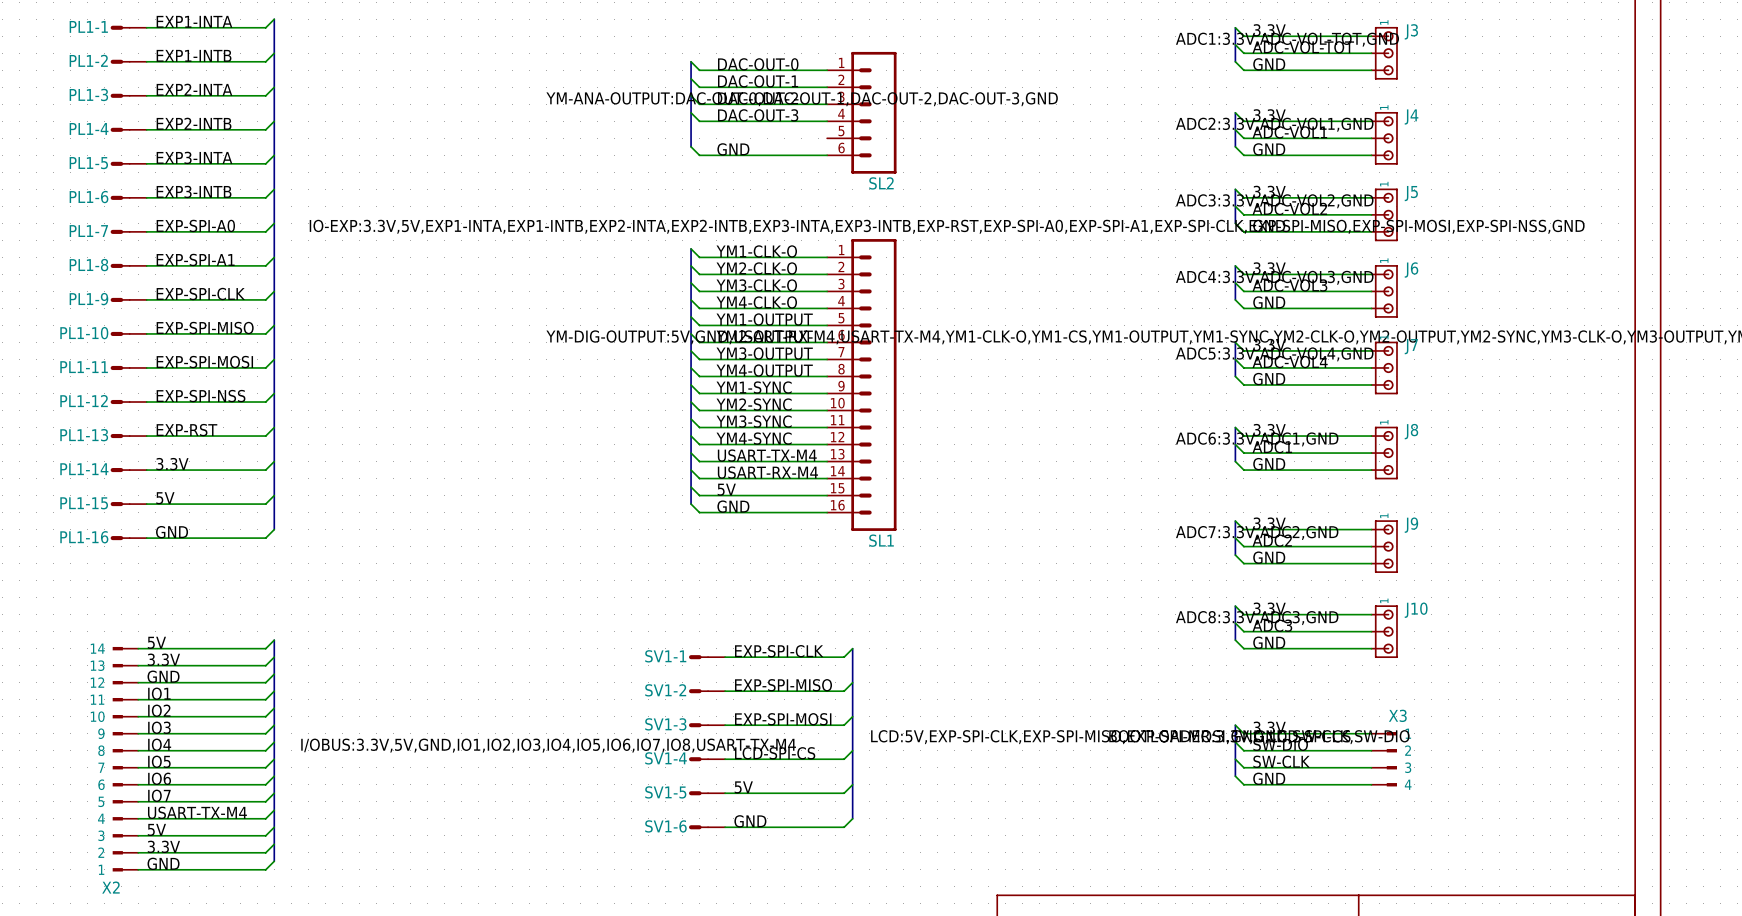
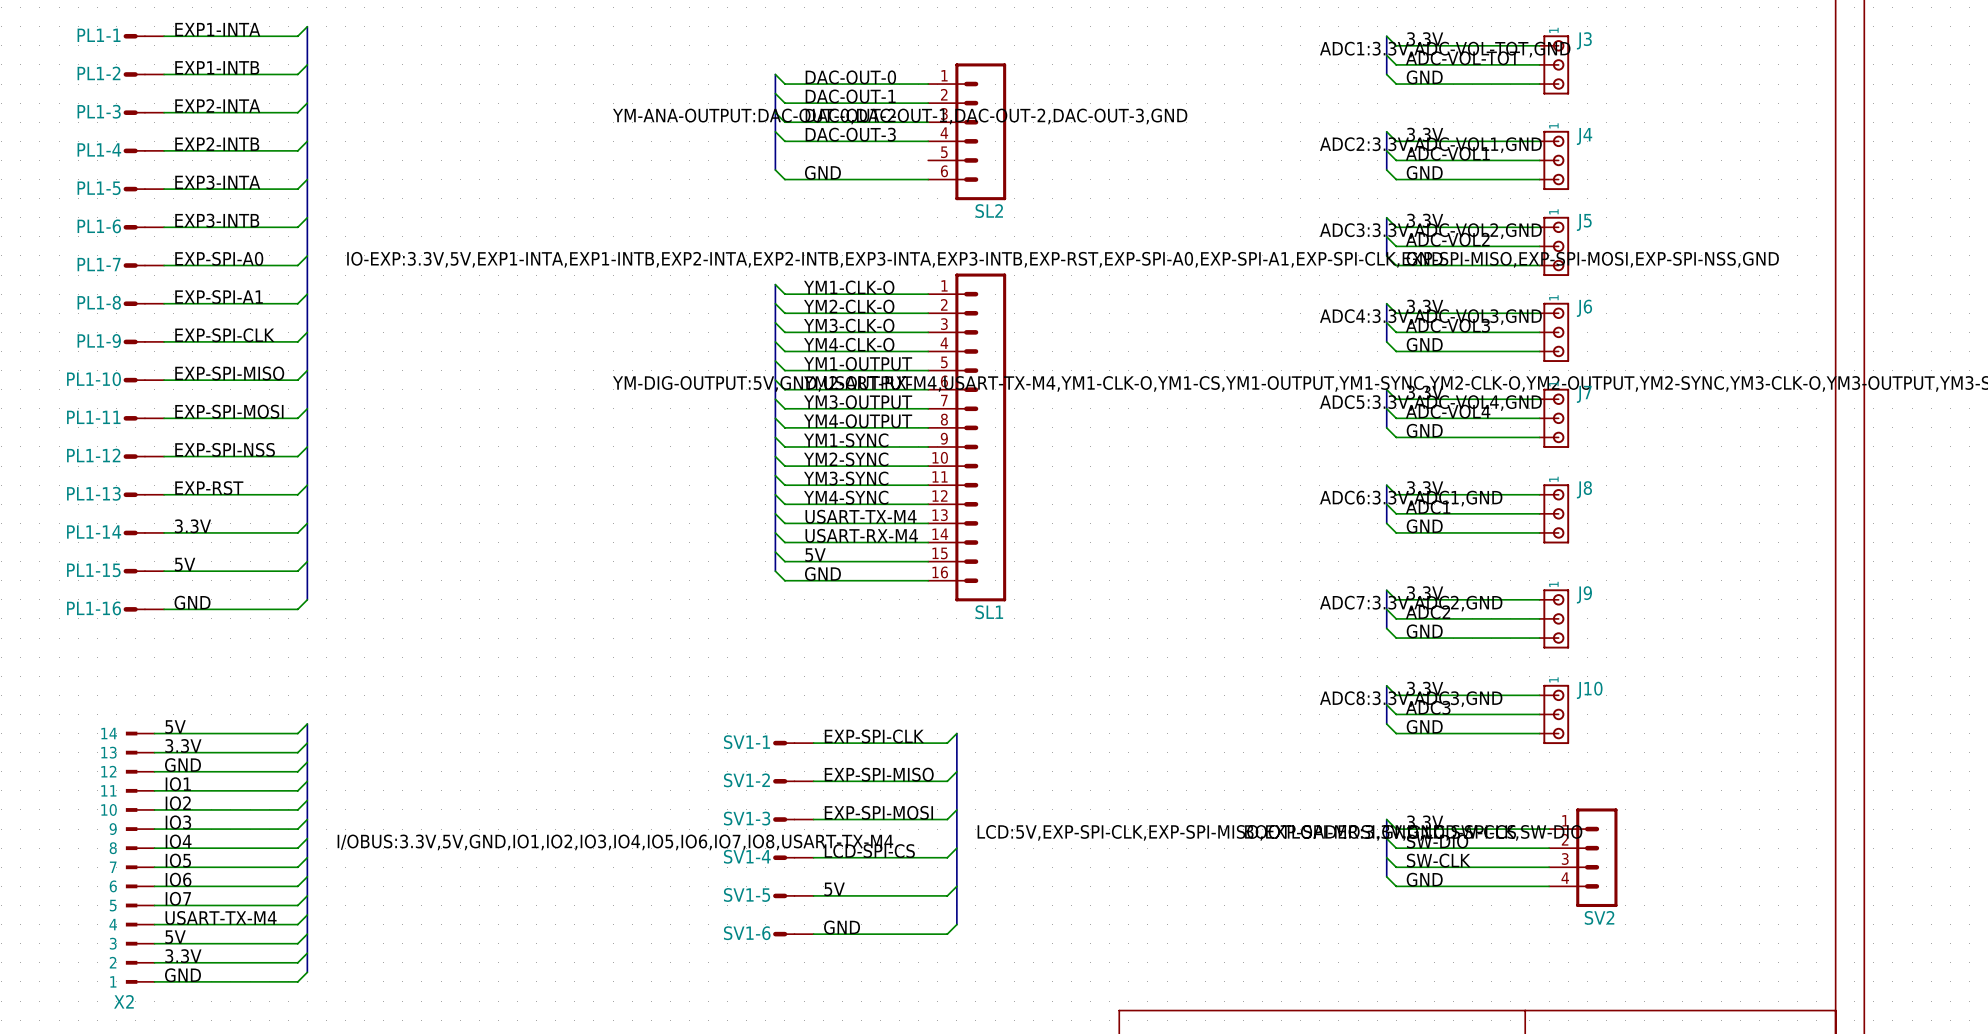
X3: (1384, 759) -> none
SV2: none -> (1583, 857)

